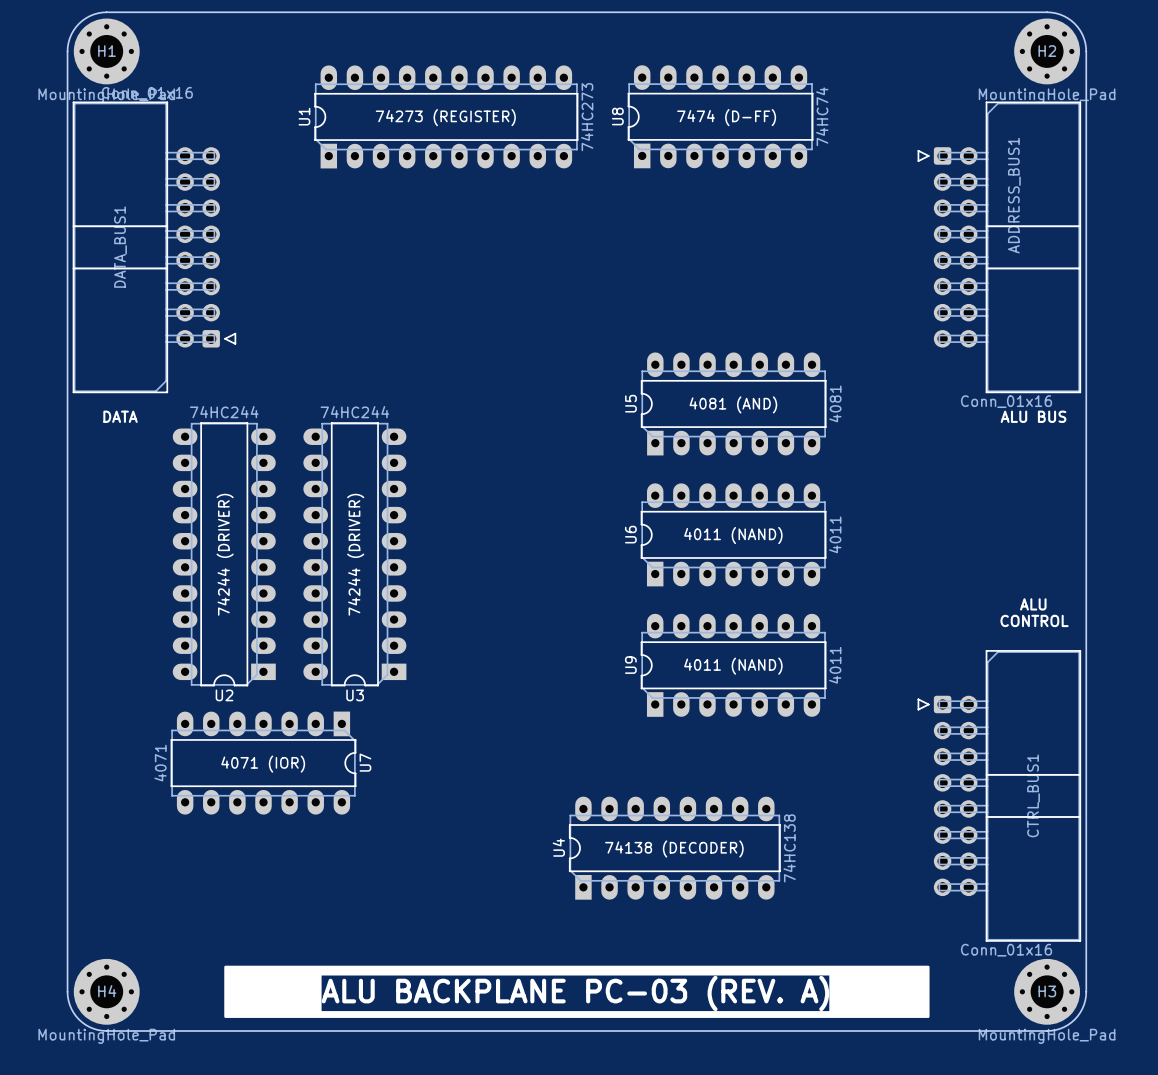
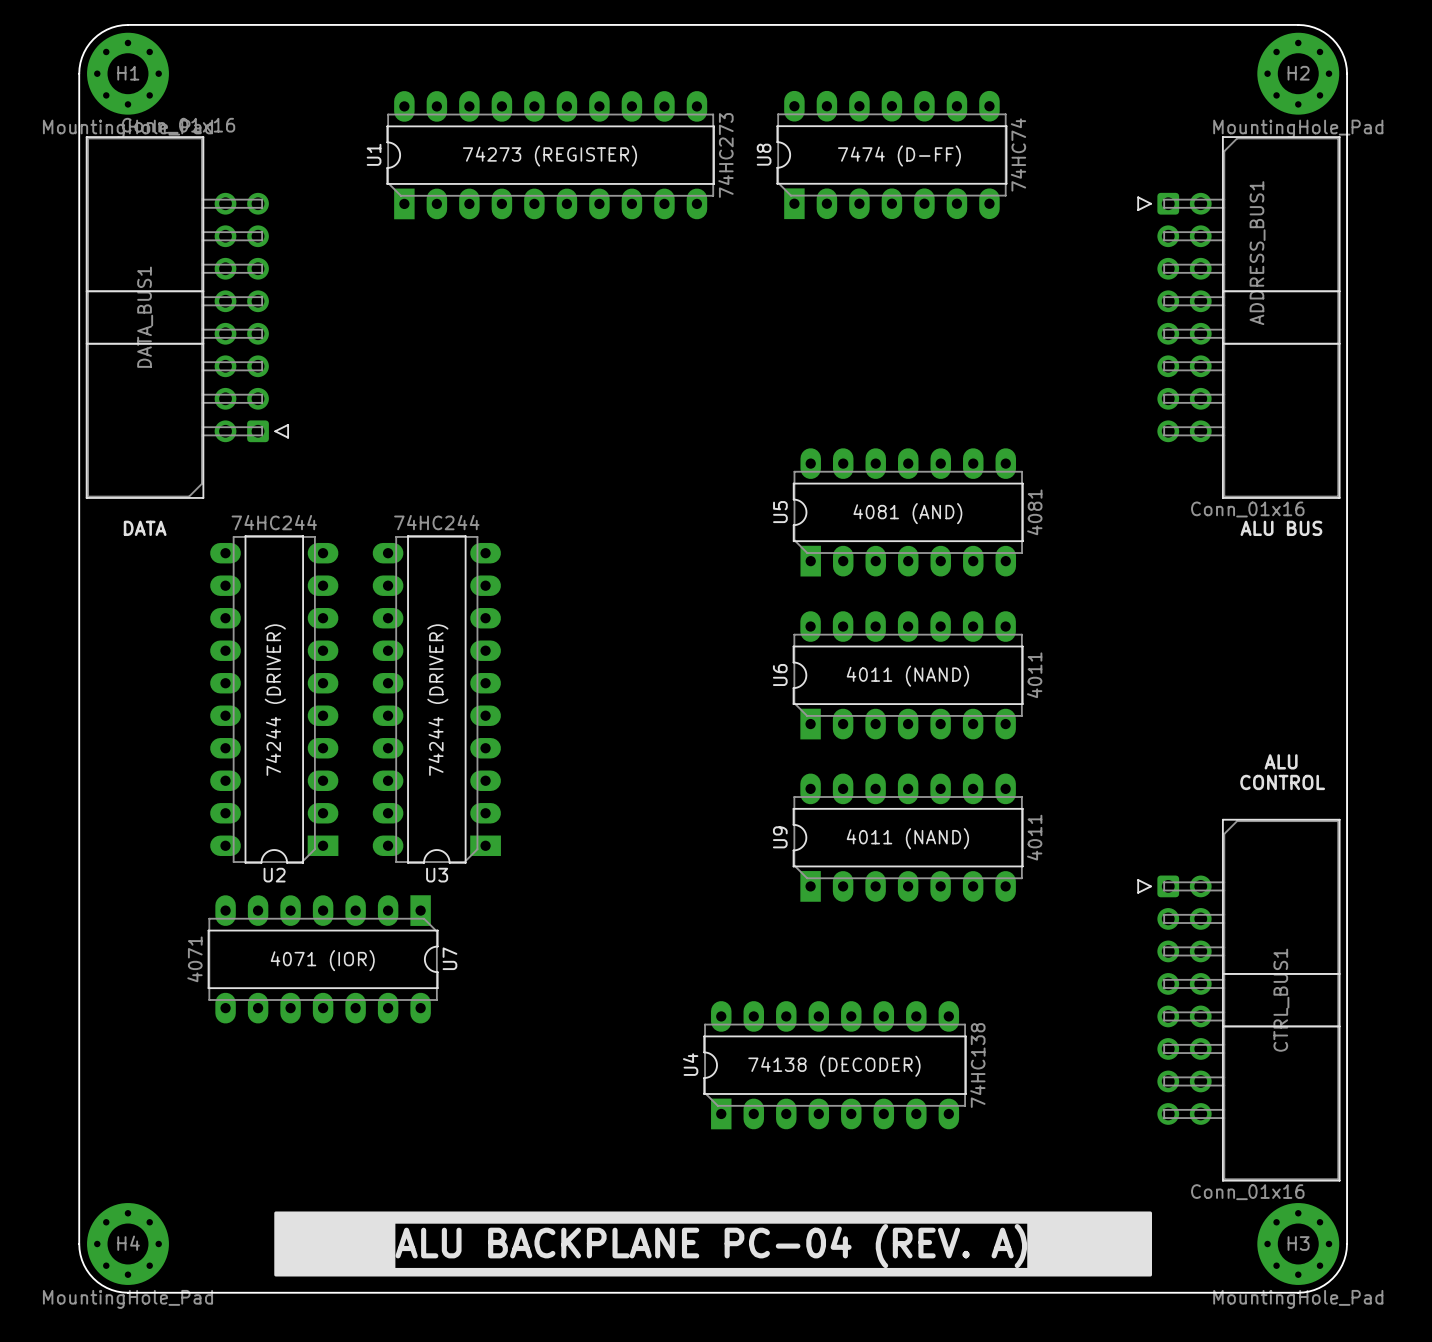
text: ALU BACKPLANE PC-03 (REV. A) (575, 993) -> ALU BACKPLANE PC-04 (REV. A) (711, 1246)

